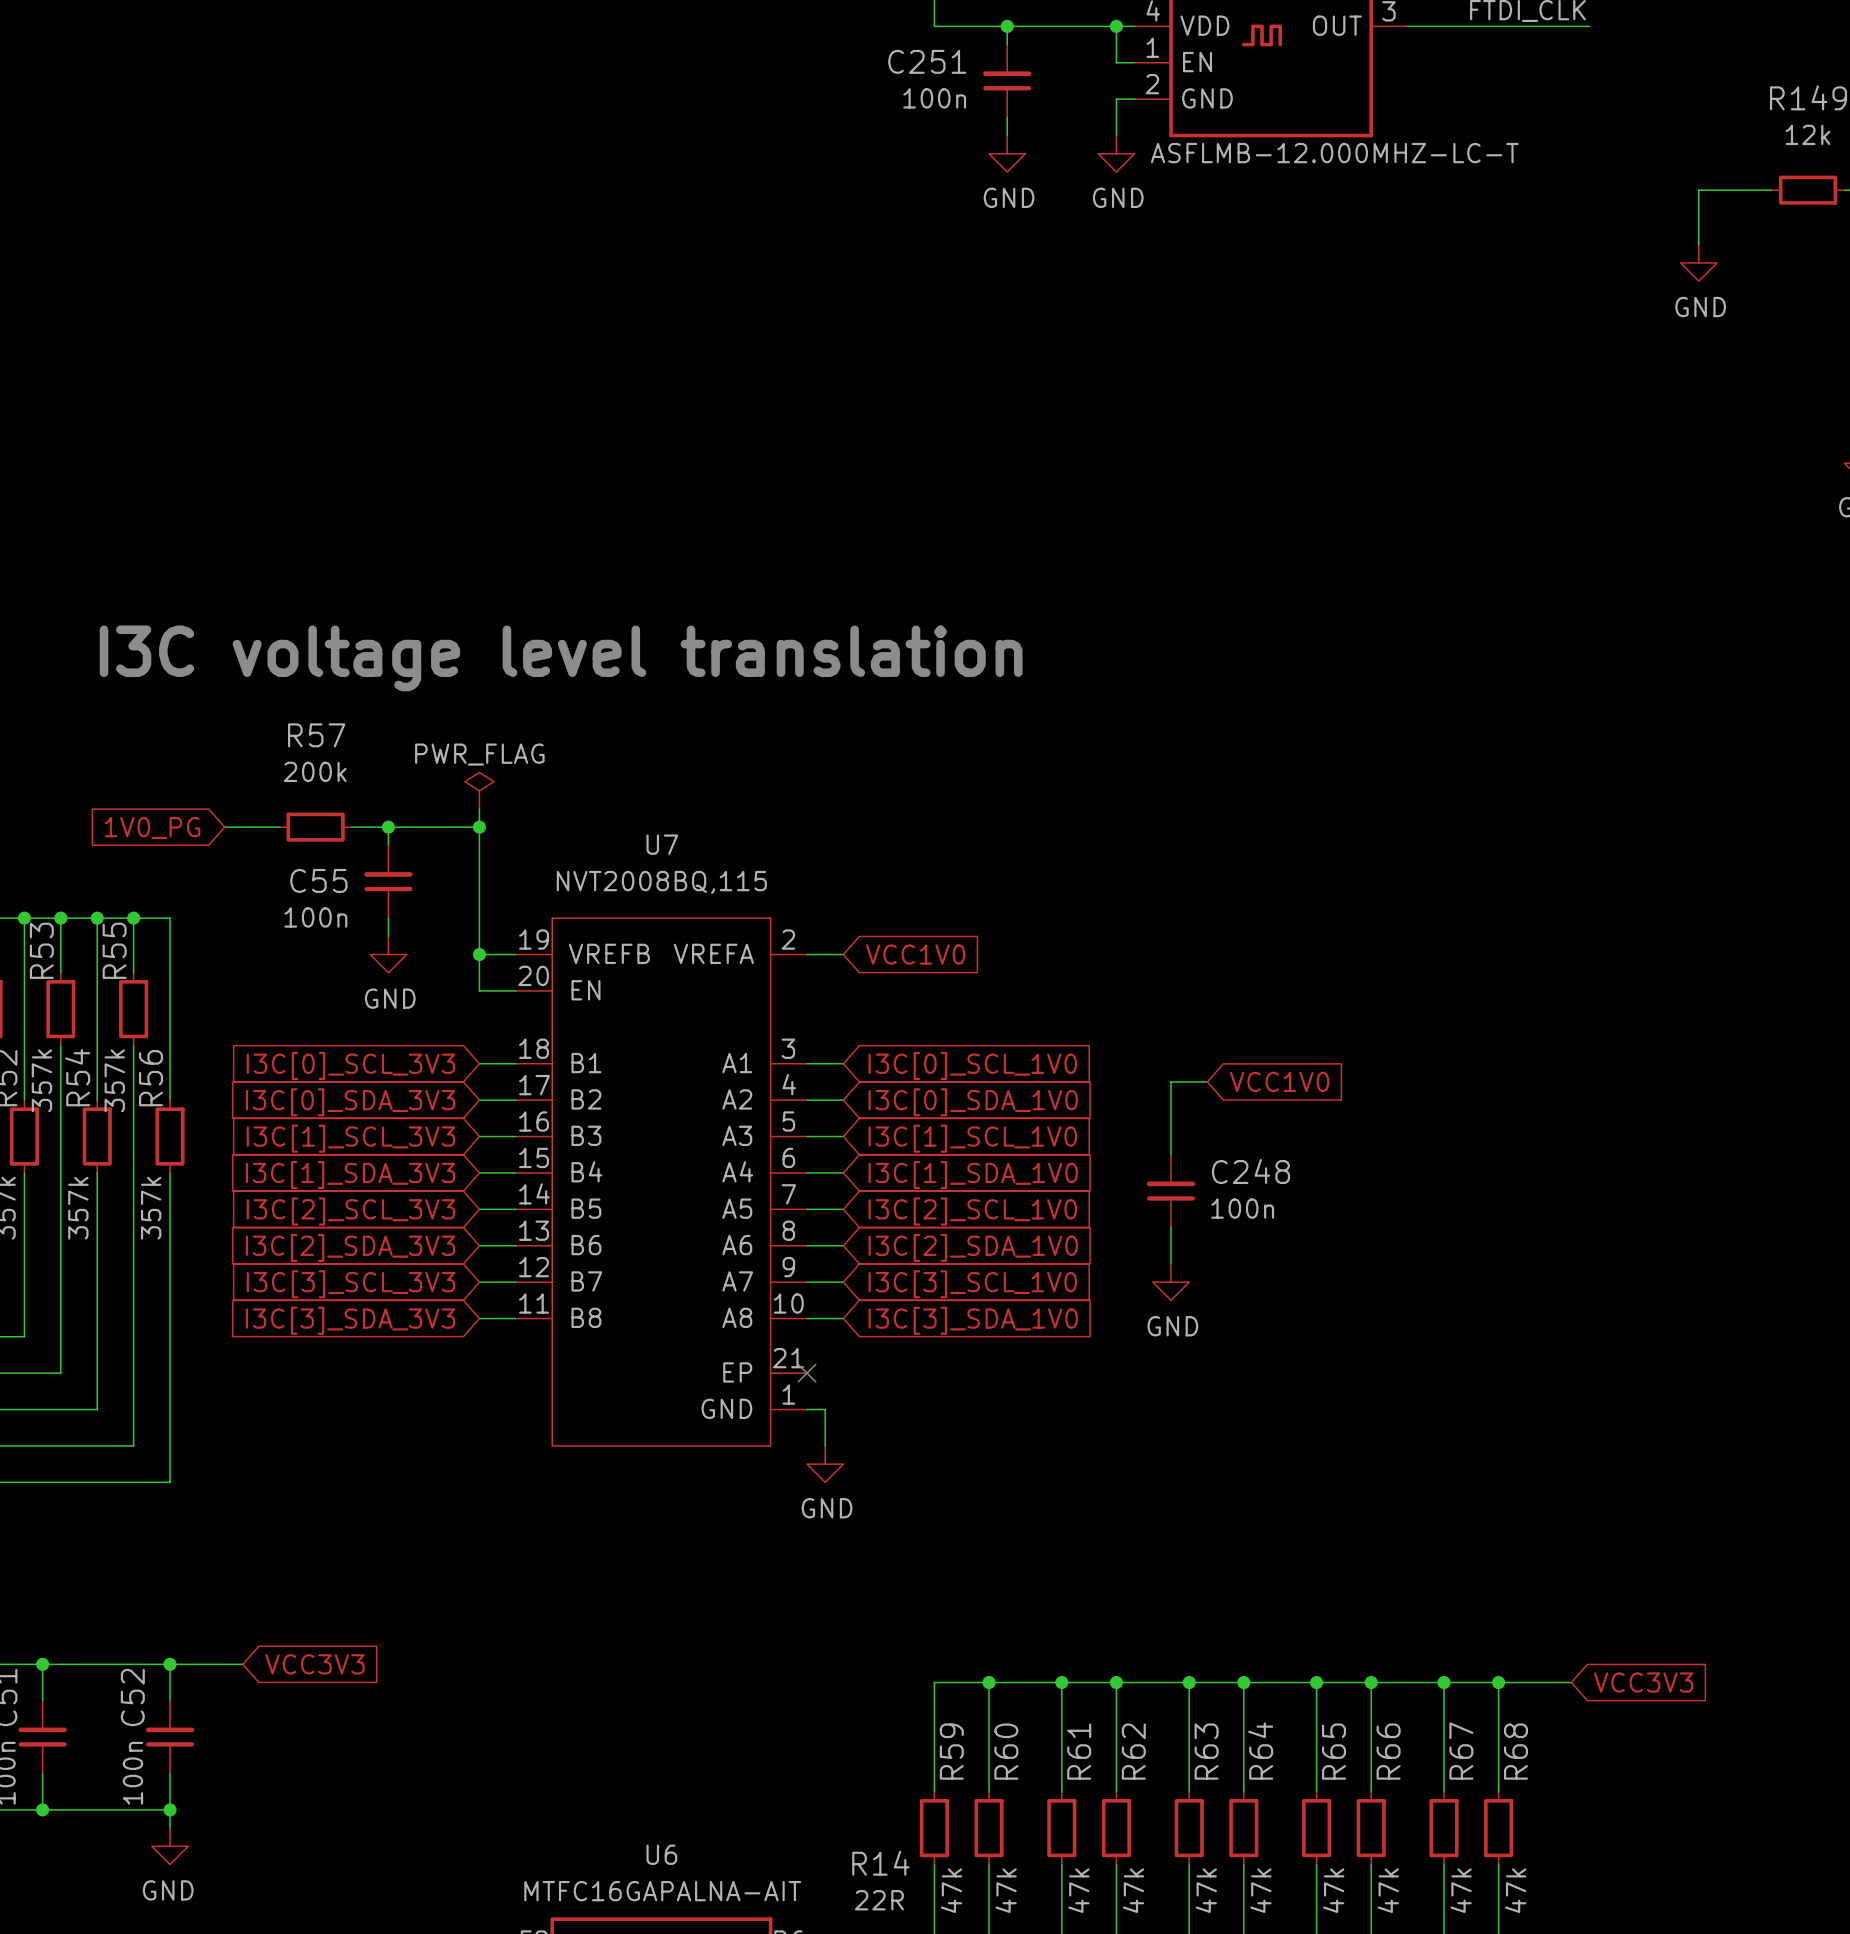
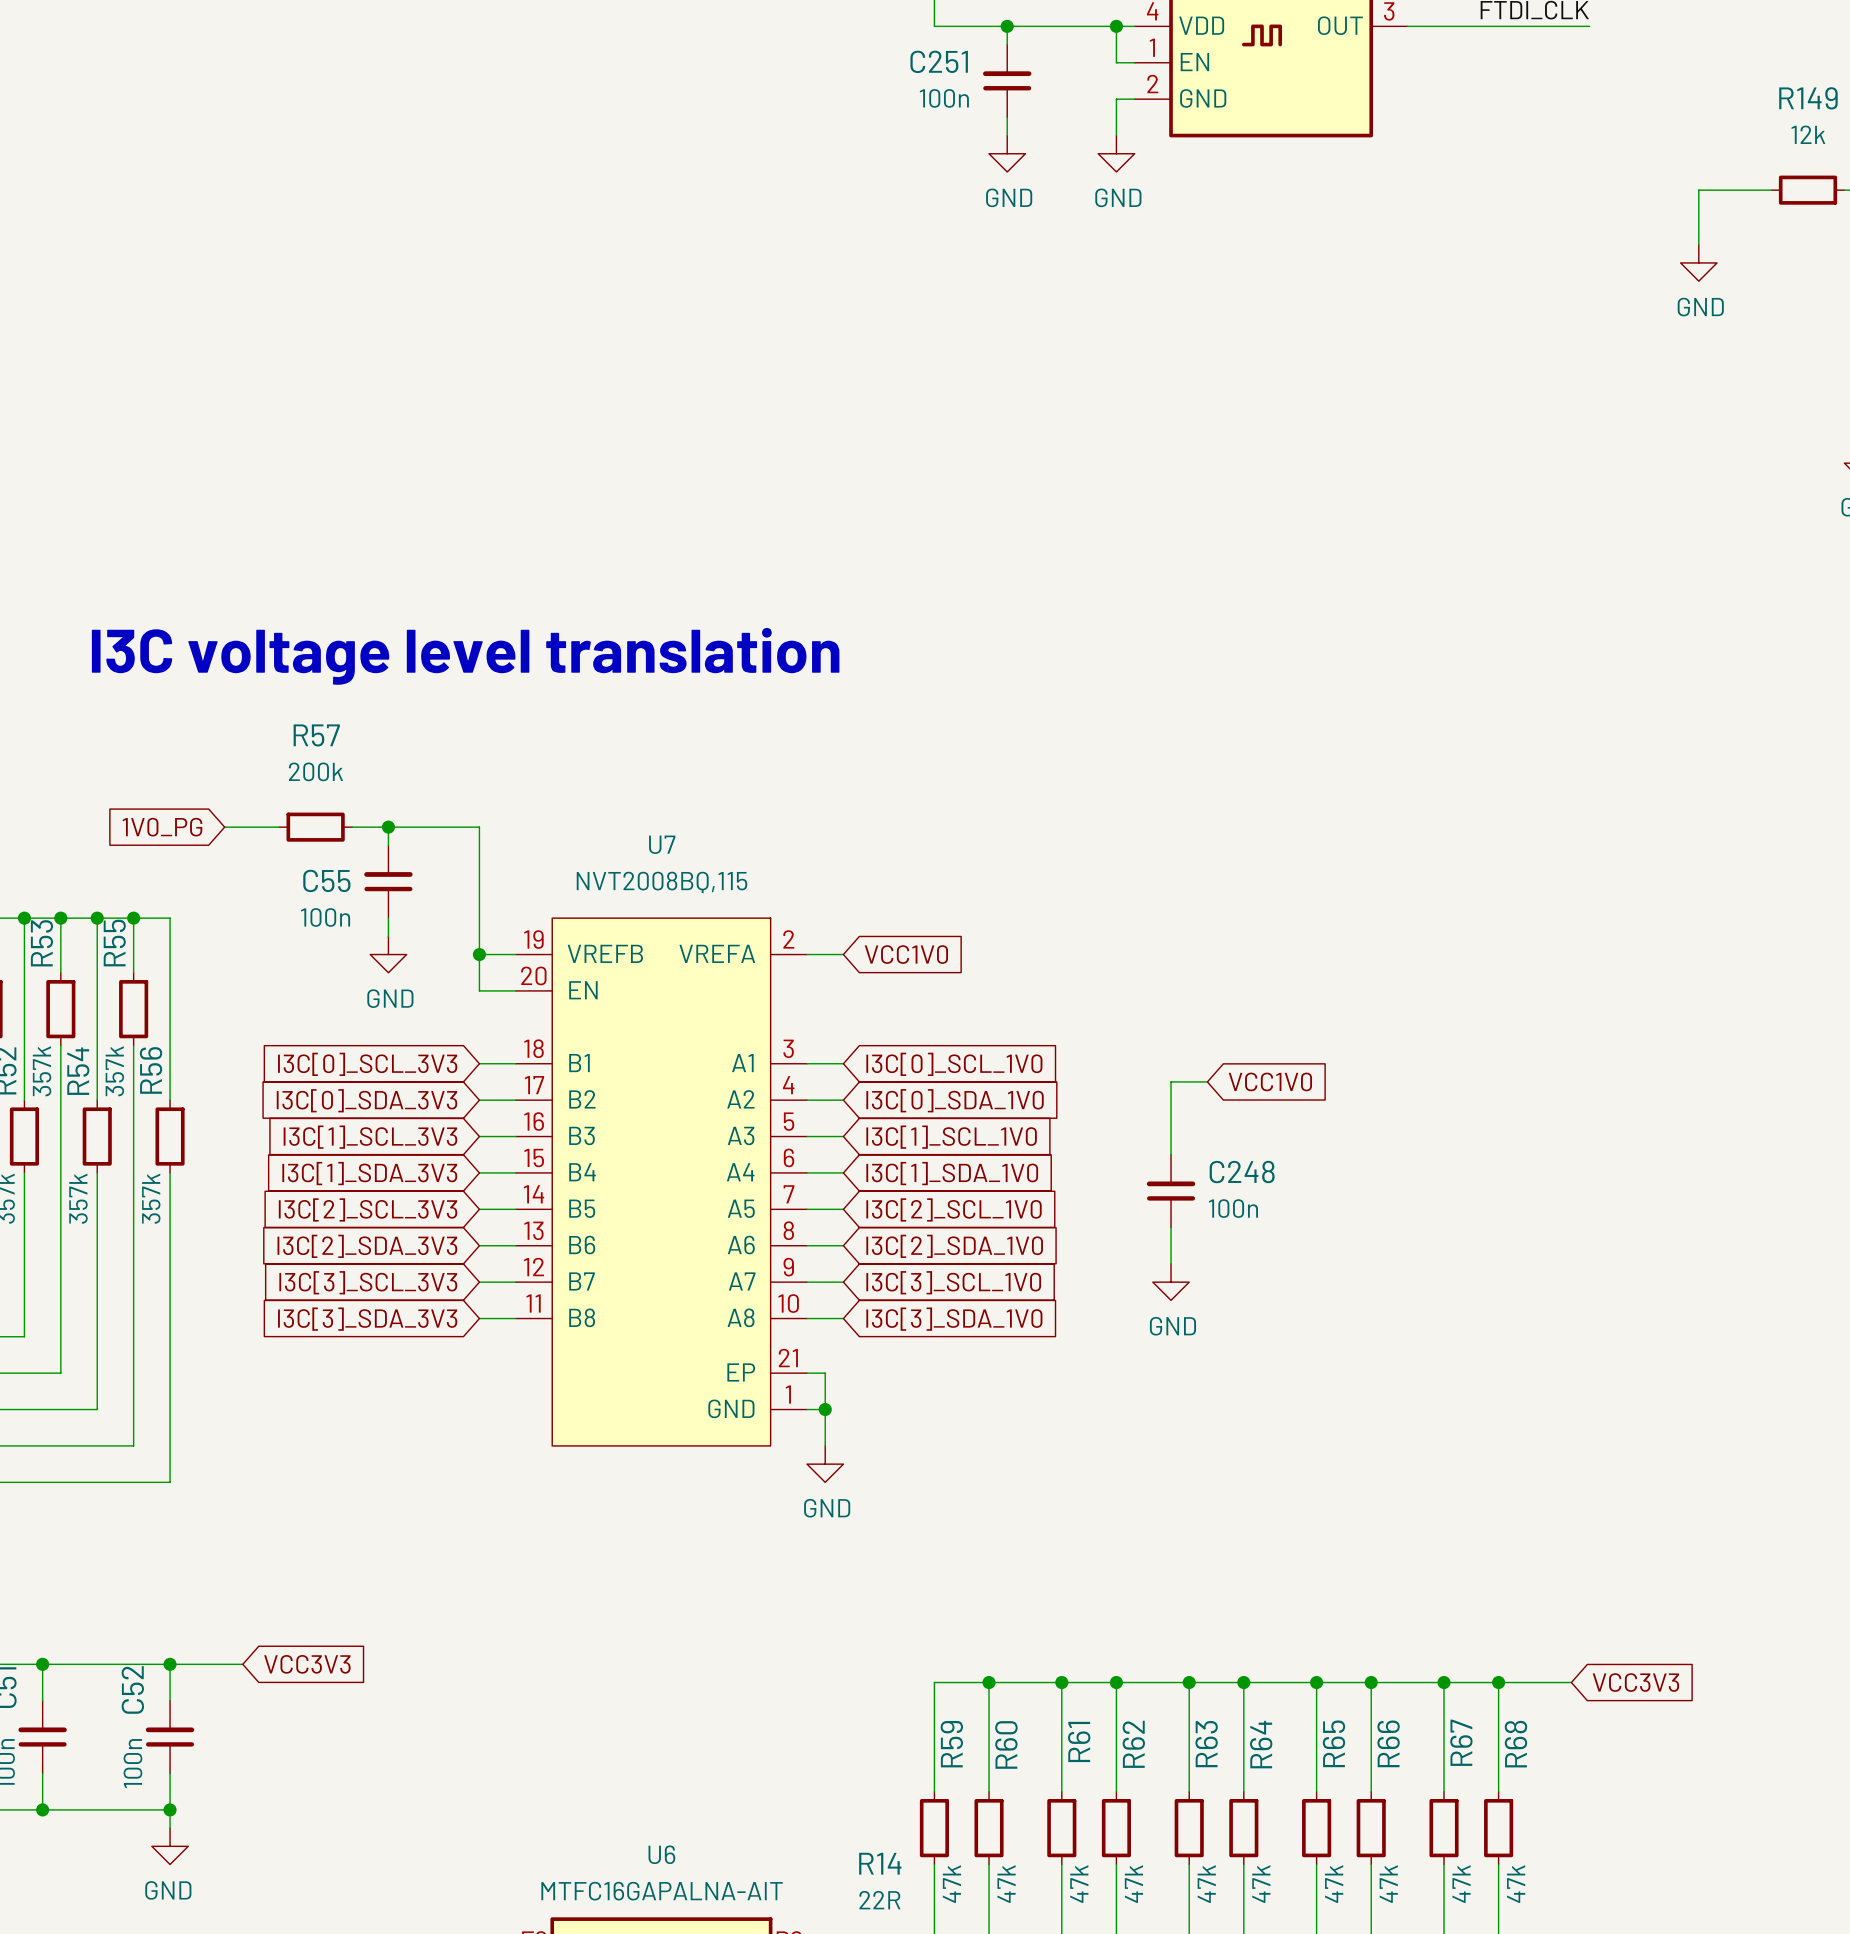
part text: ASFLMB-12.000MHZ-LC-T (1334, 153) -> none
power symbol: PWR_FLAG (479, 790) -> none
wire: (479, 808) (479, 827) -> none
junction: (479, 827) -> none
wire: none -> (807, 1373) (825, 1373) (825, 1409)
no-connect mark: (807, 1373) -> none
junction: none -> (825, 1409)

